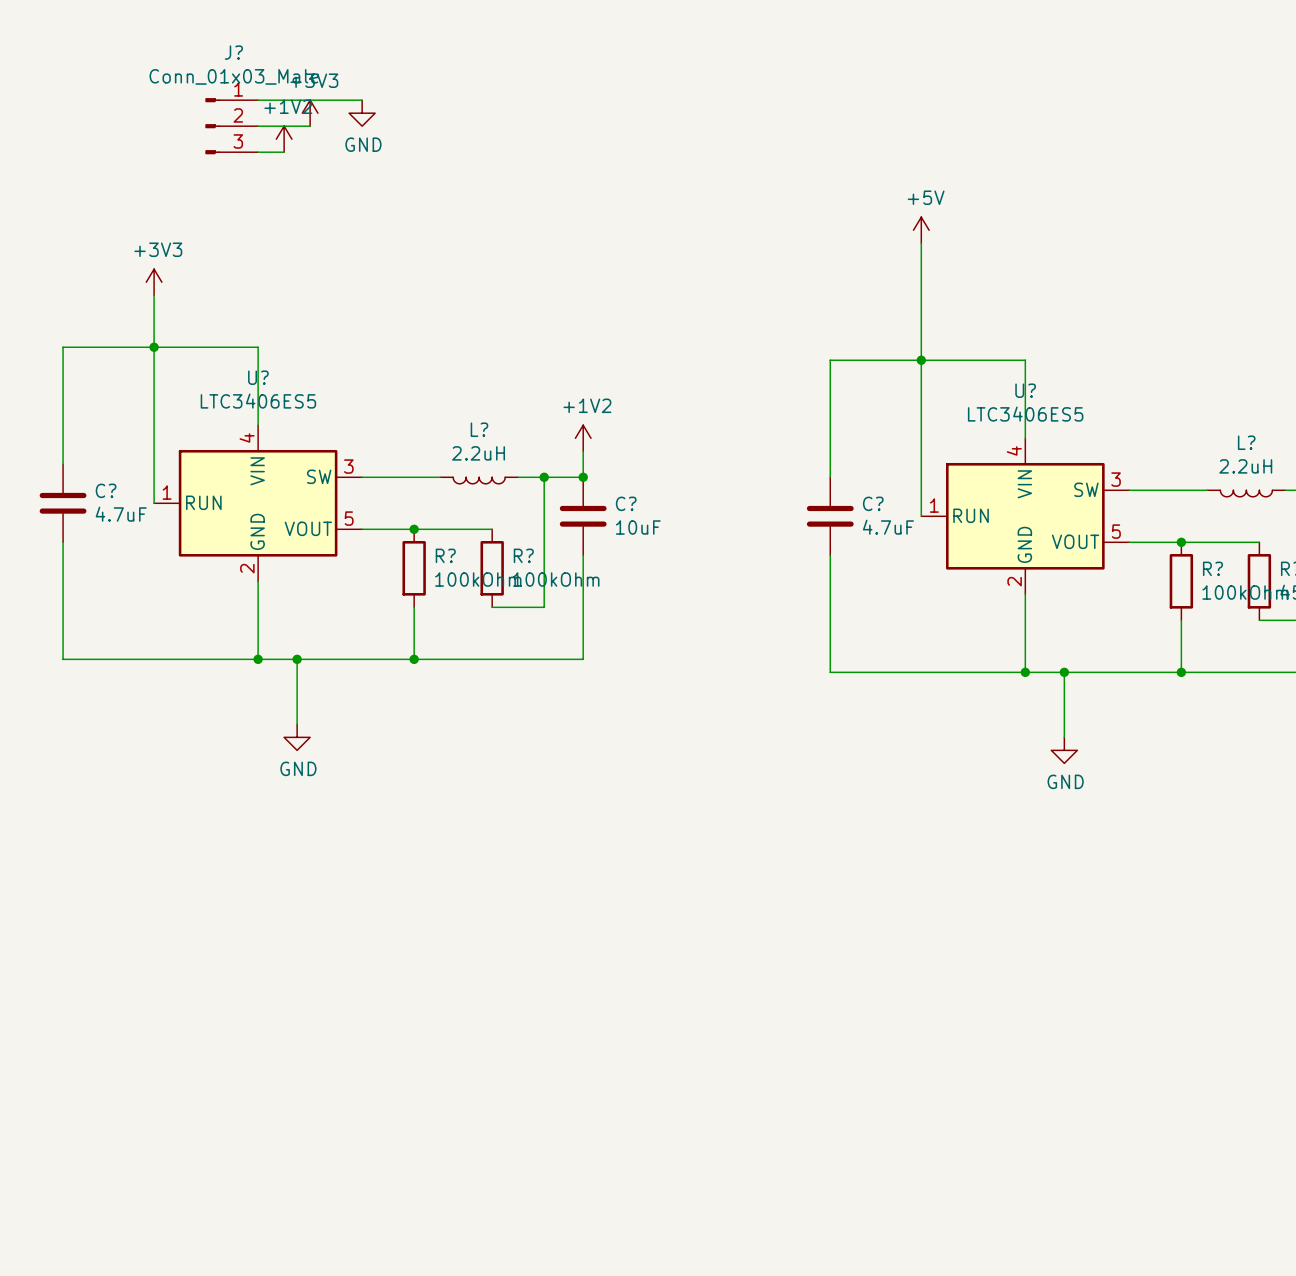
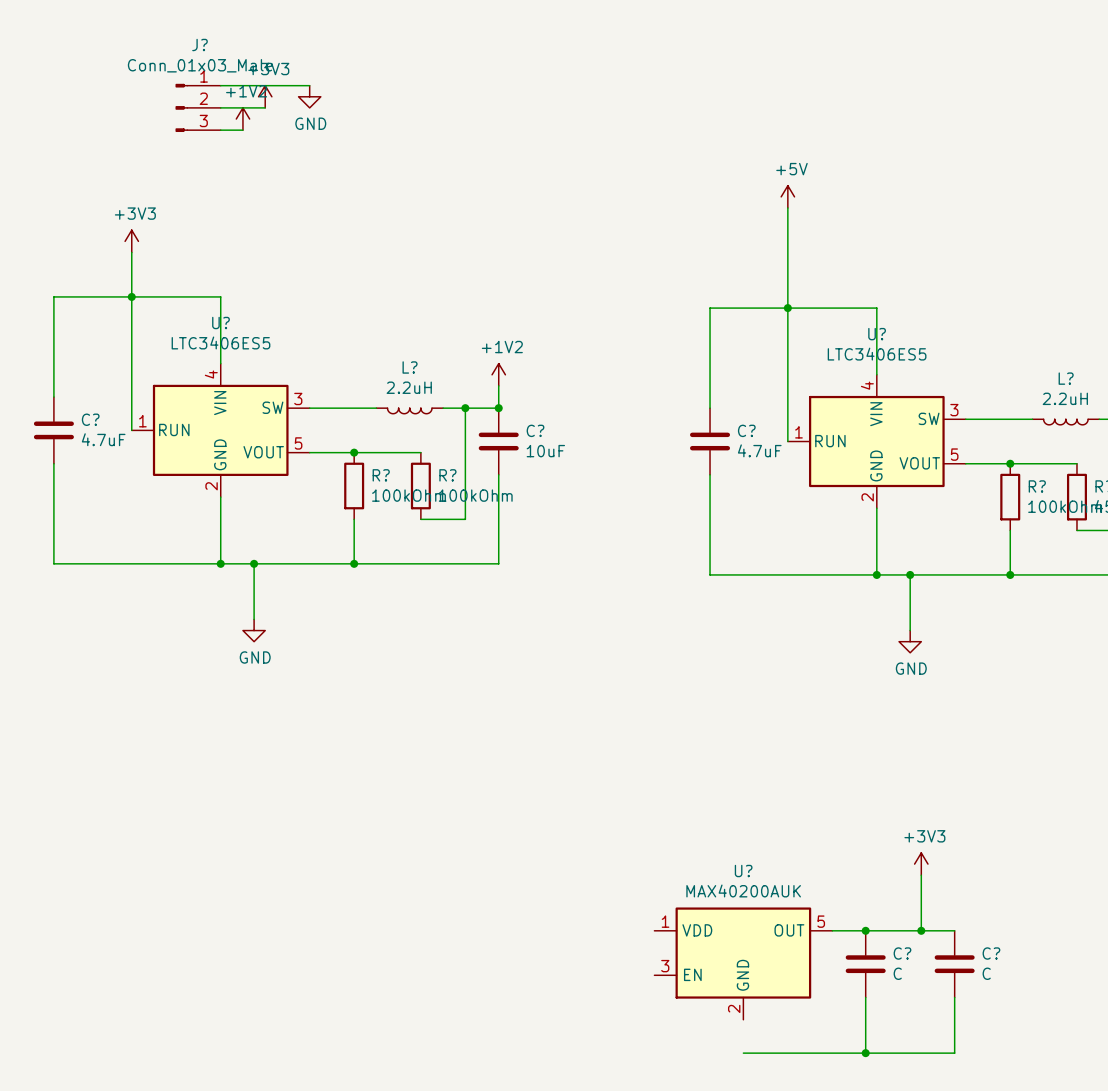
power symbol: none -> +3V3 (921, 864)
wire: none -> (921, 875) (921, 930)
wire: none -> (832, 930) (954, 930)
junction: none -> (865, 930)
junction: none -> (921, 930)
U?: none -> MAX40200AUK (743, 963)
C?: none -> C (865, 964)
C?: none -> C (954, 964)
wire: none -> (865, 997) (865, 1053)
wire: none -> (954, 997) (954, 1053) (743, 1053)
junction: none -> (865, 1053)

